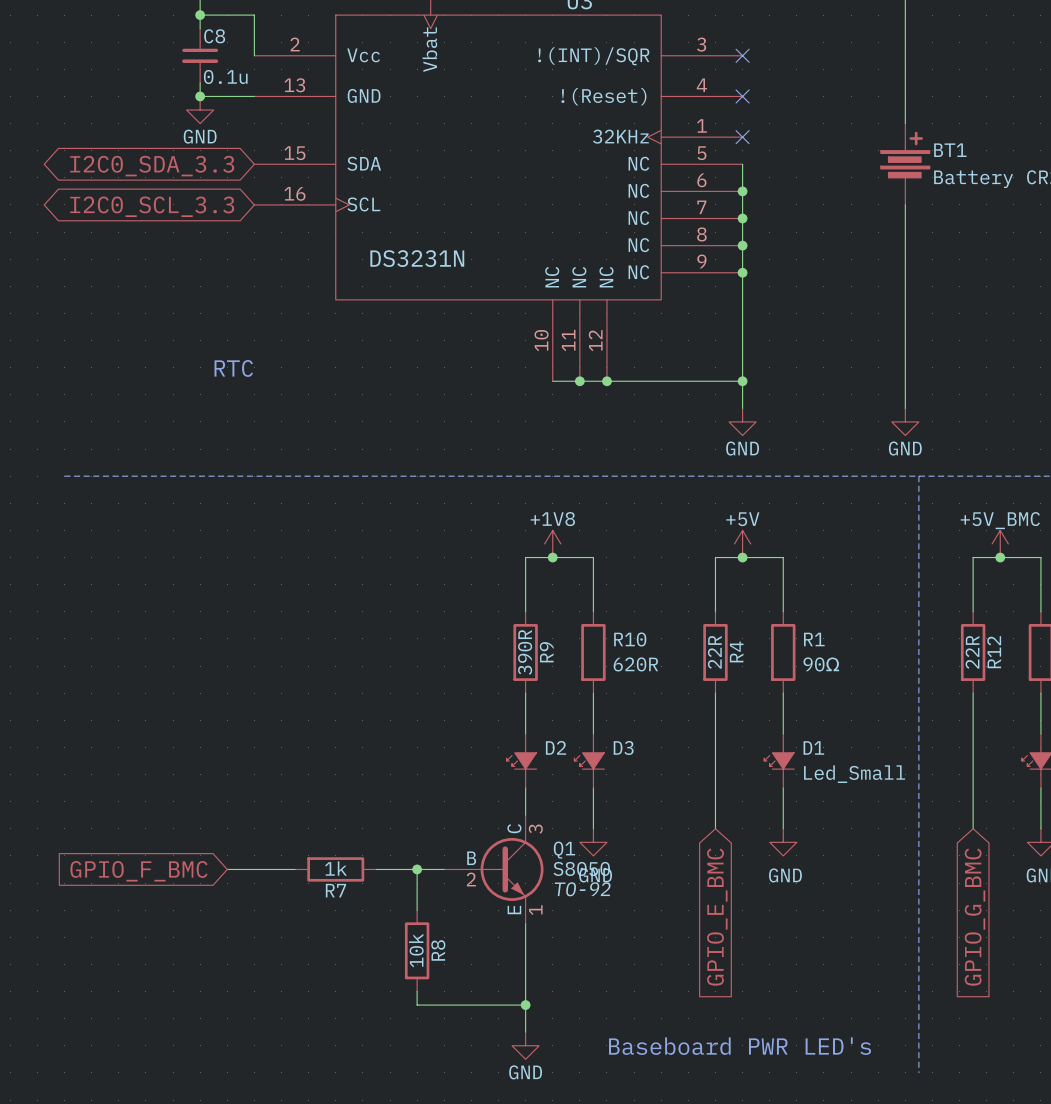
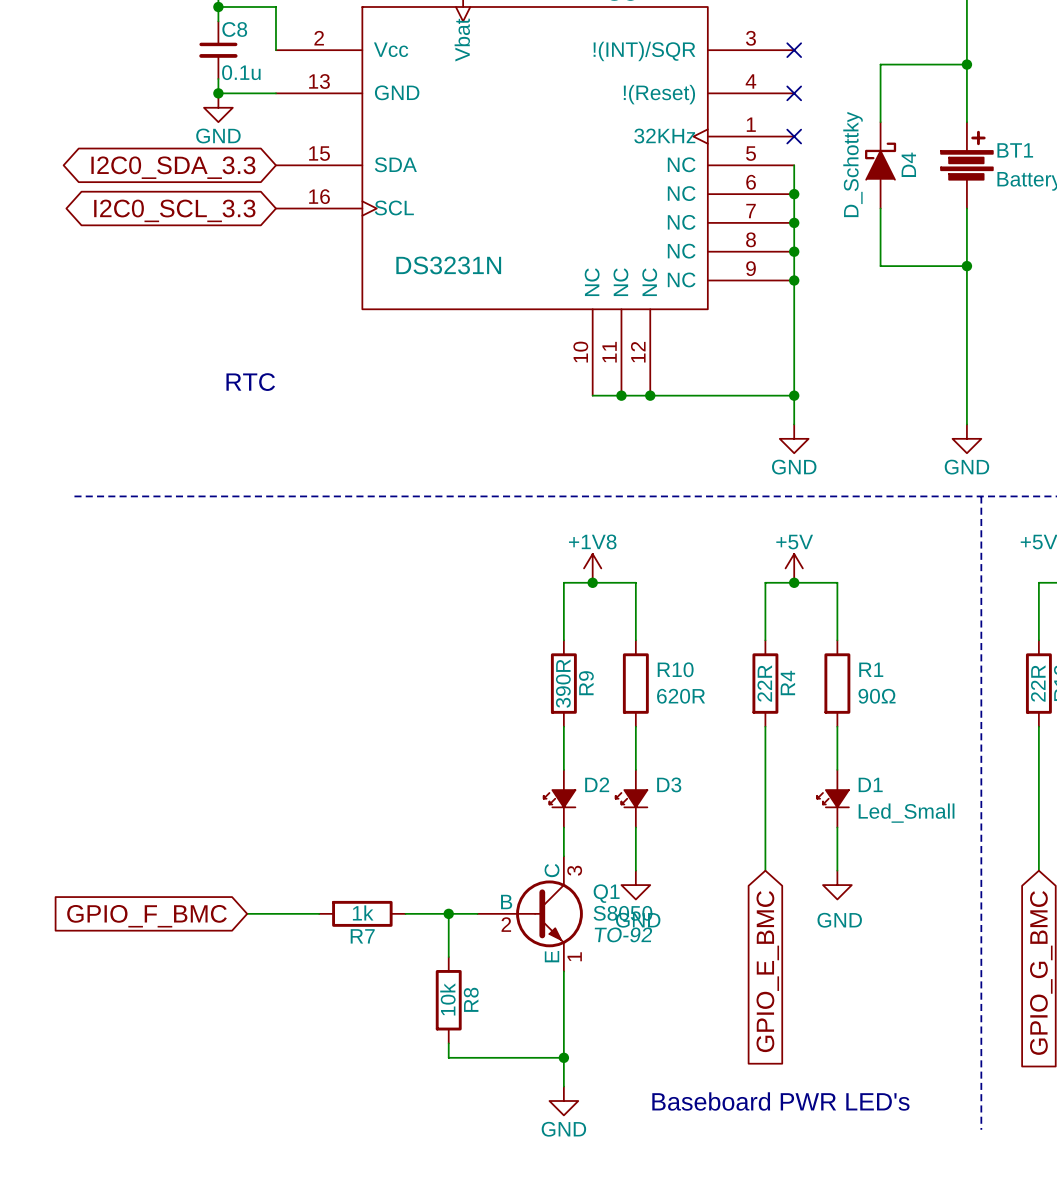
wire: none -> (966, 64) (880, 64) (880, 122)
junction: none -> (966, 64)
D4: none -> D_Schottky (880, 165)
wire: none -> (880, 208) (880, 266) (966, 266)
junction: none -> (966, 266)

